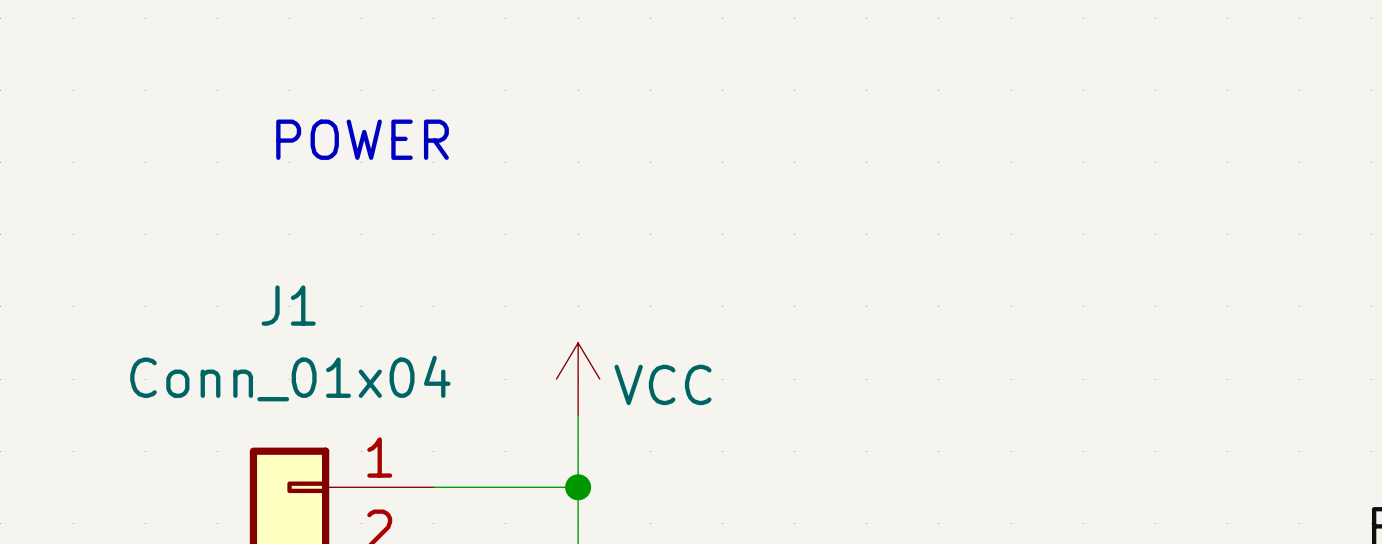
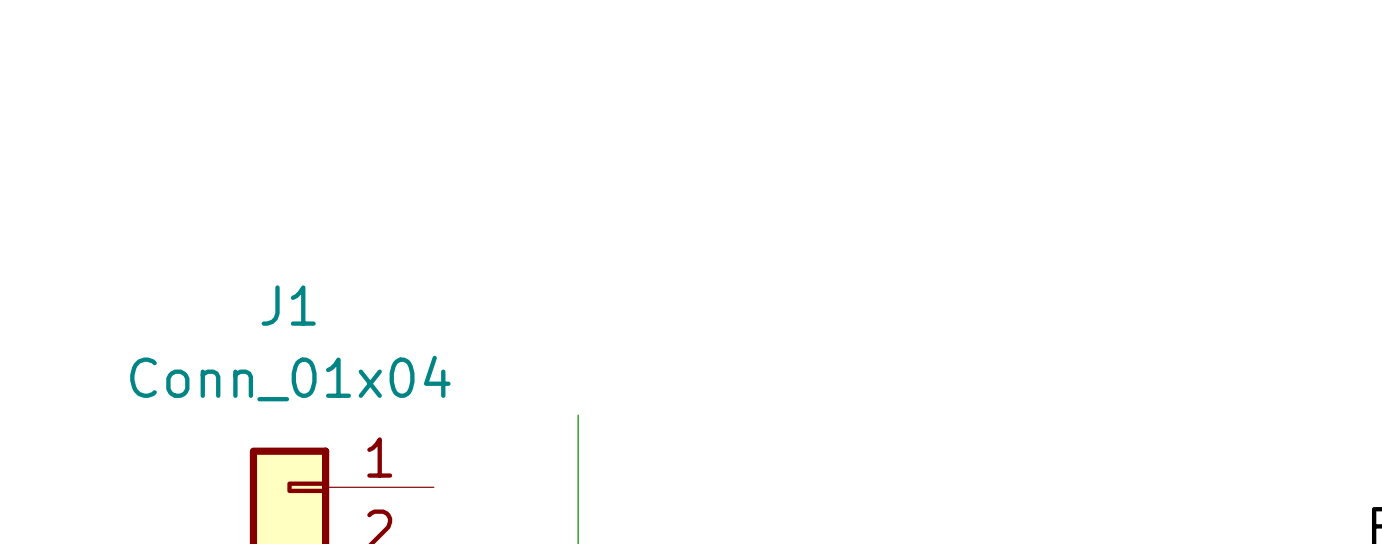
text: POWER (362, 139) -> none
power symbol: VCC (578, 379) -> none
wire: (433, 487) (578, 487) -> none
junction: (578, 487) -> none

